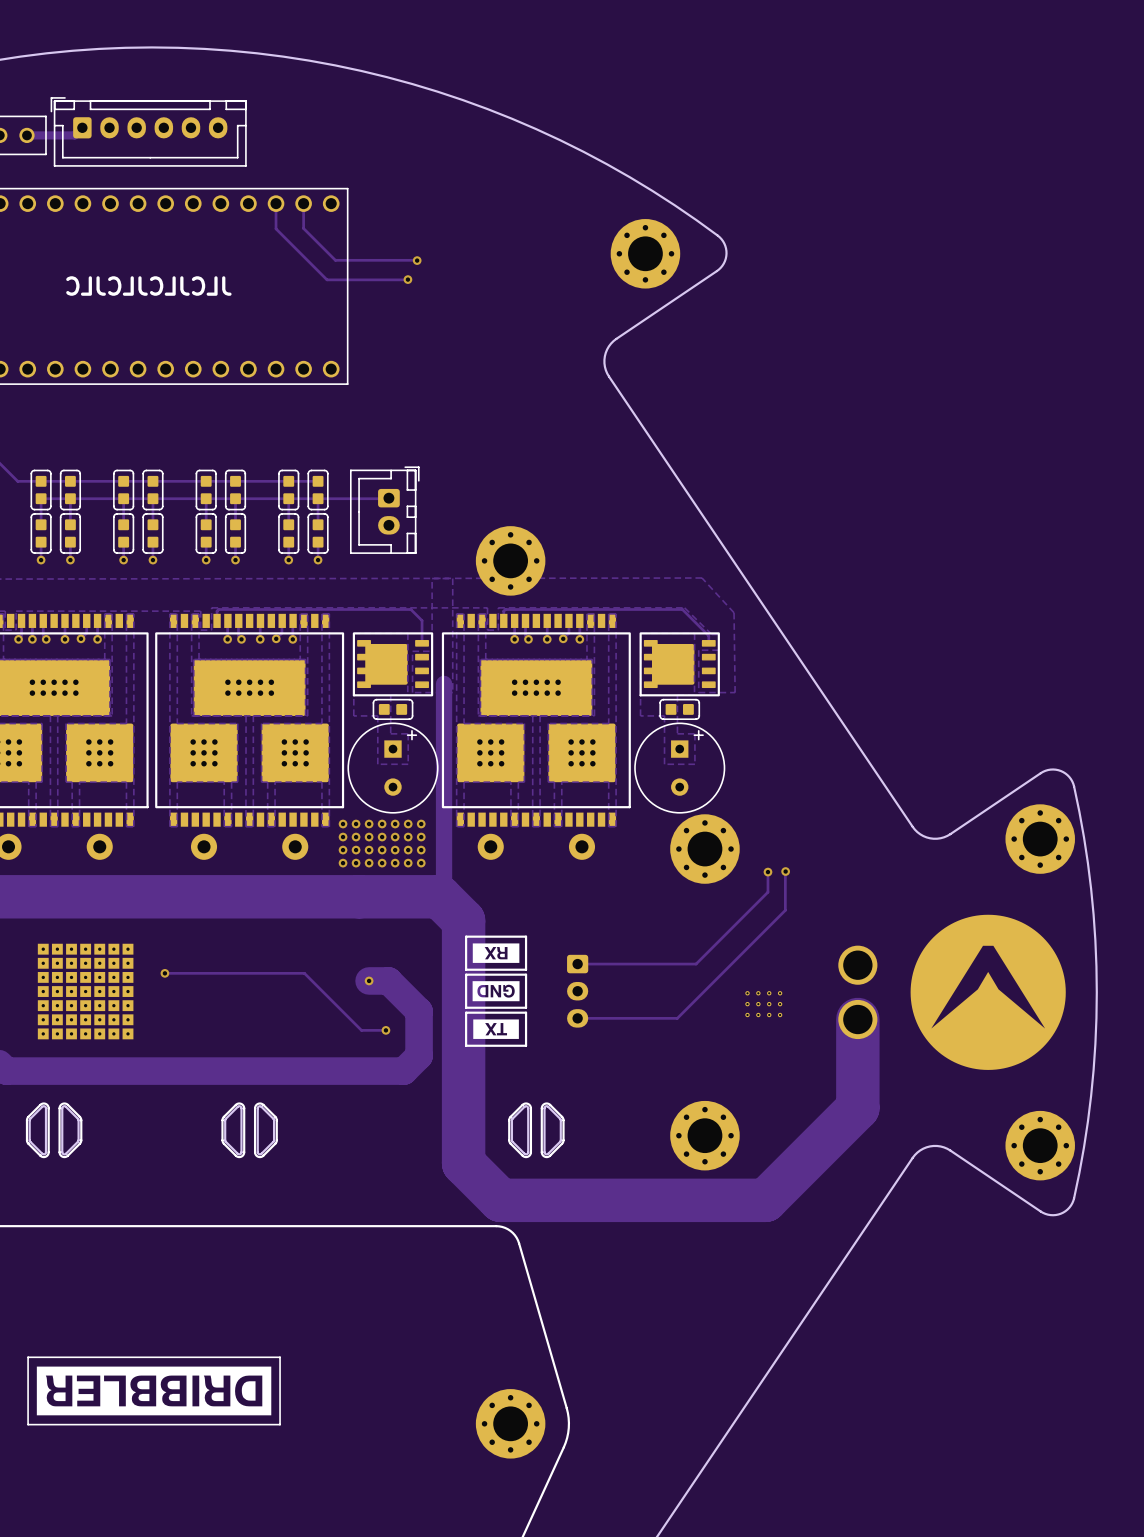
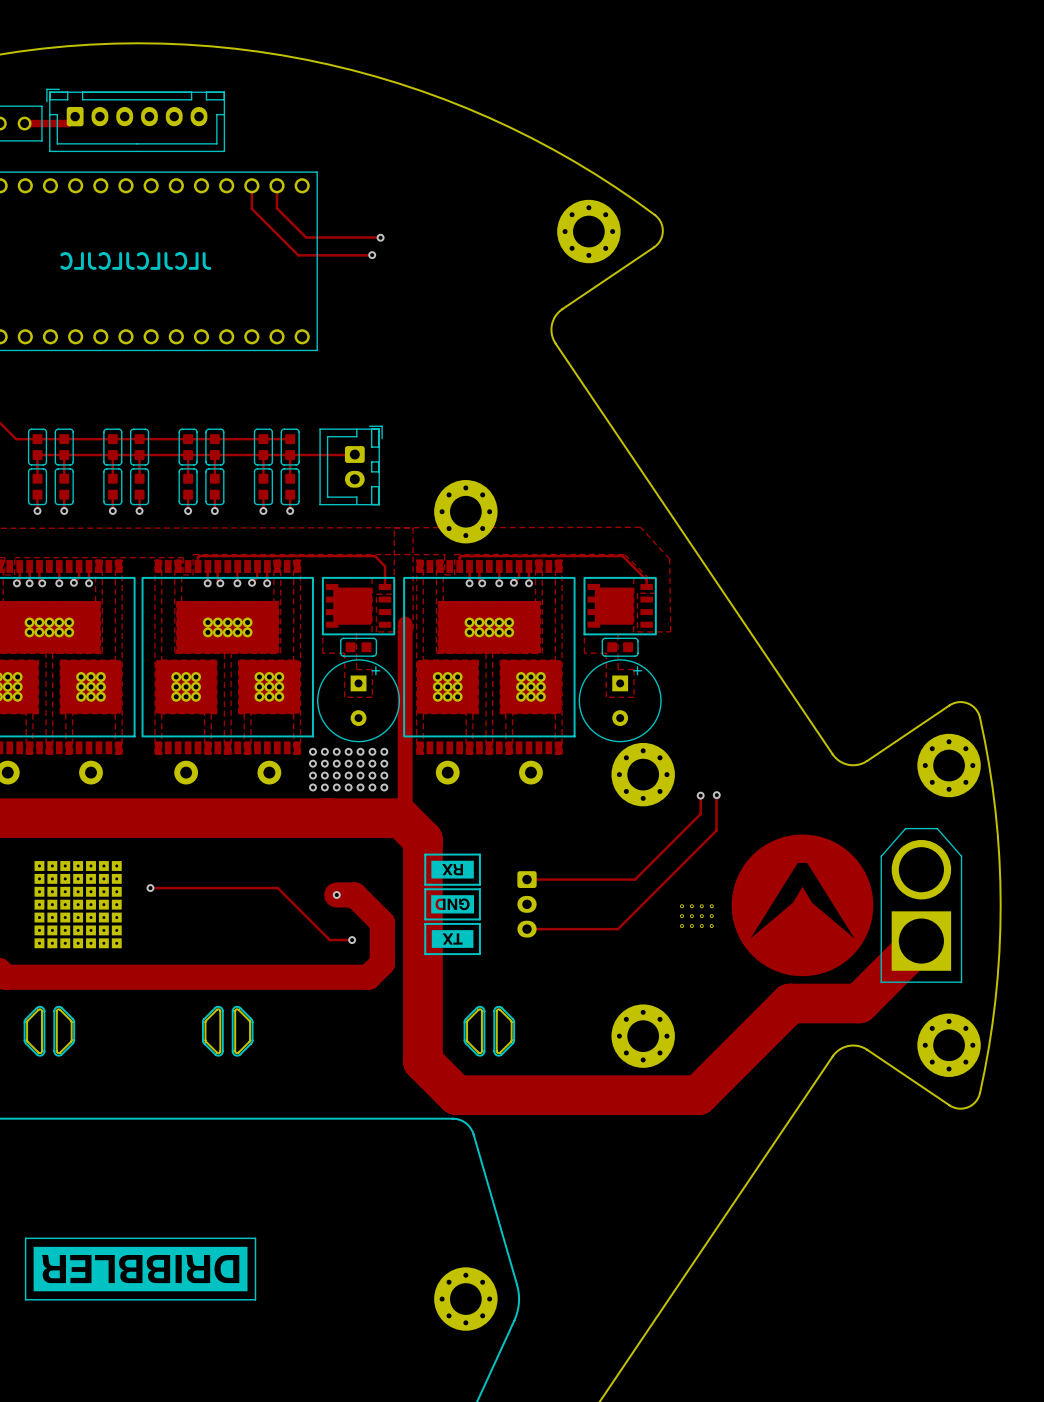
part: (857, 965) -> none
part position: (988, 992) -> (802, 905)
part: none -> (921, 905)
track: (857, 1019) (857, 1108) -> (921, 941) (858, 1003) (790, 1003) (782, 1010)
part: (857, 1019) -> none

